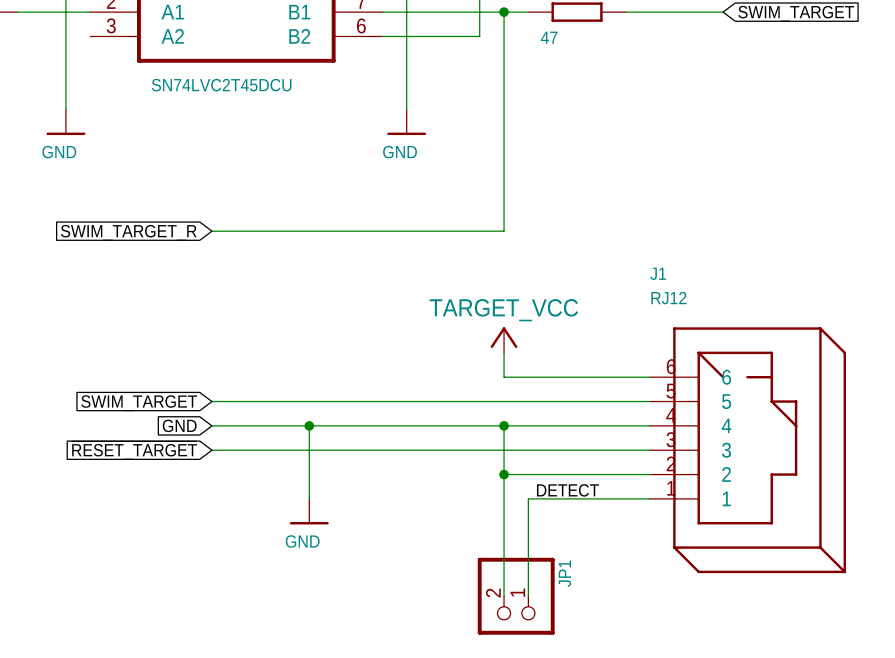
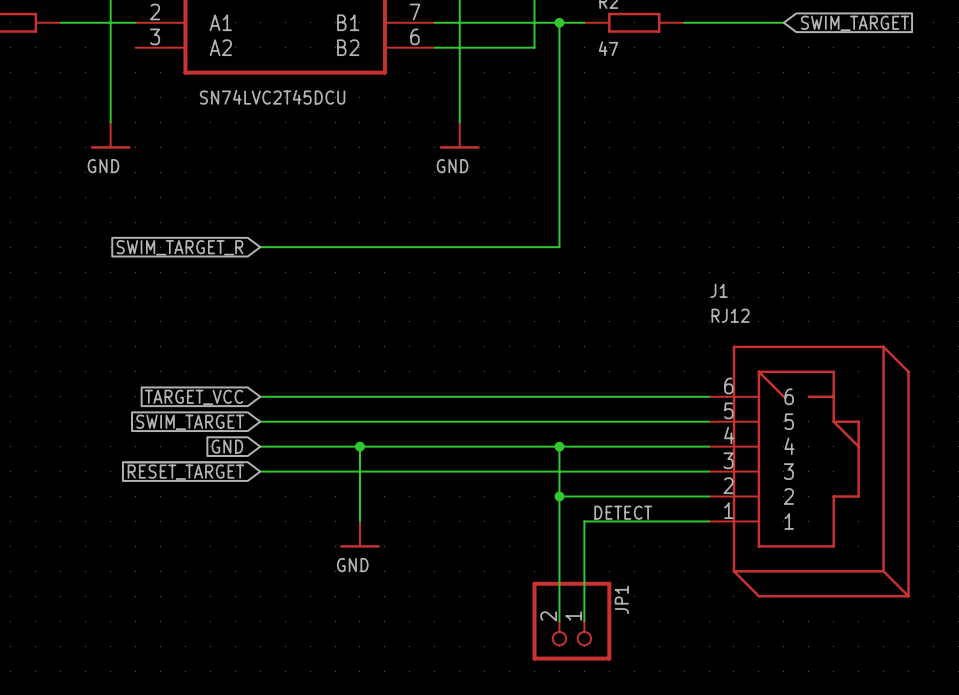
power symbol: TARGET_VCC (504, 340) -> none
wire: (504, 352) (504, 377) -> (260, 396) (559, 396)
global label: none -> TARGET_VCC (193, 397)

